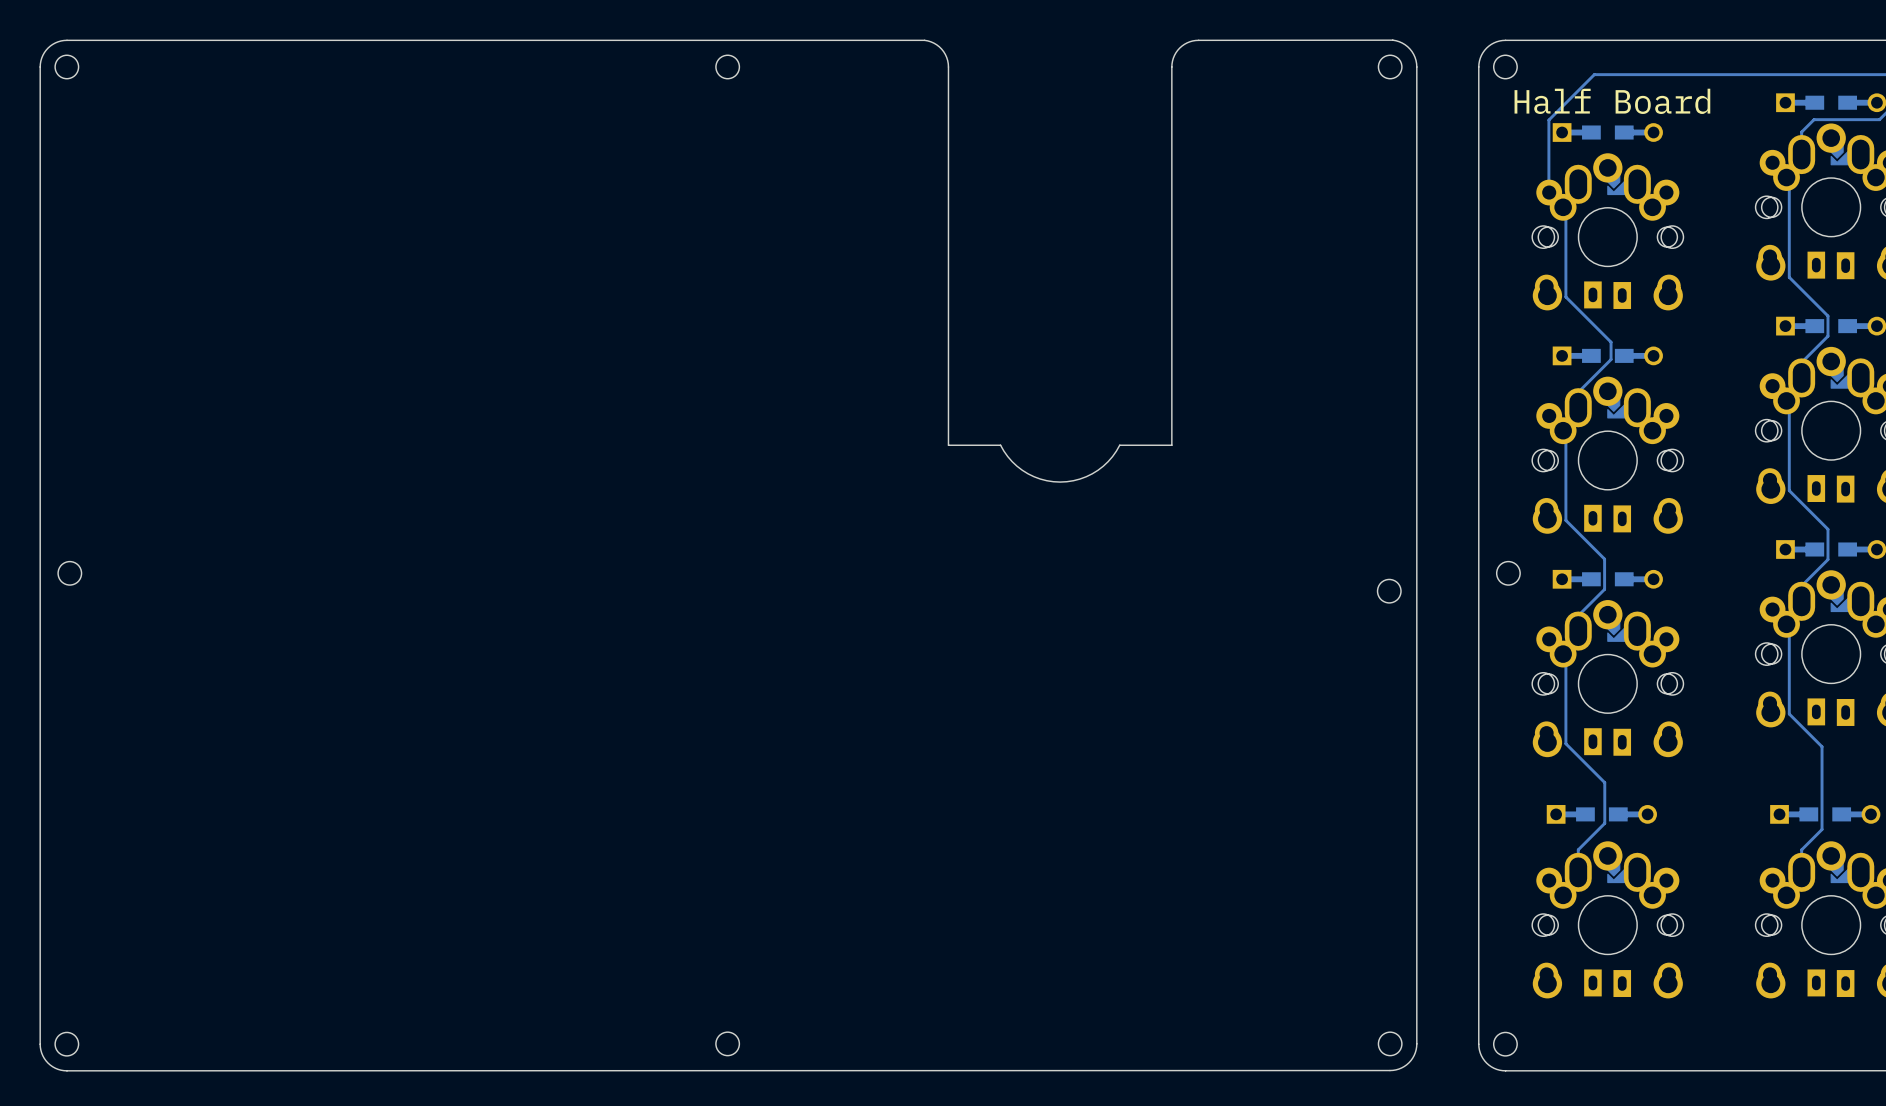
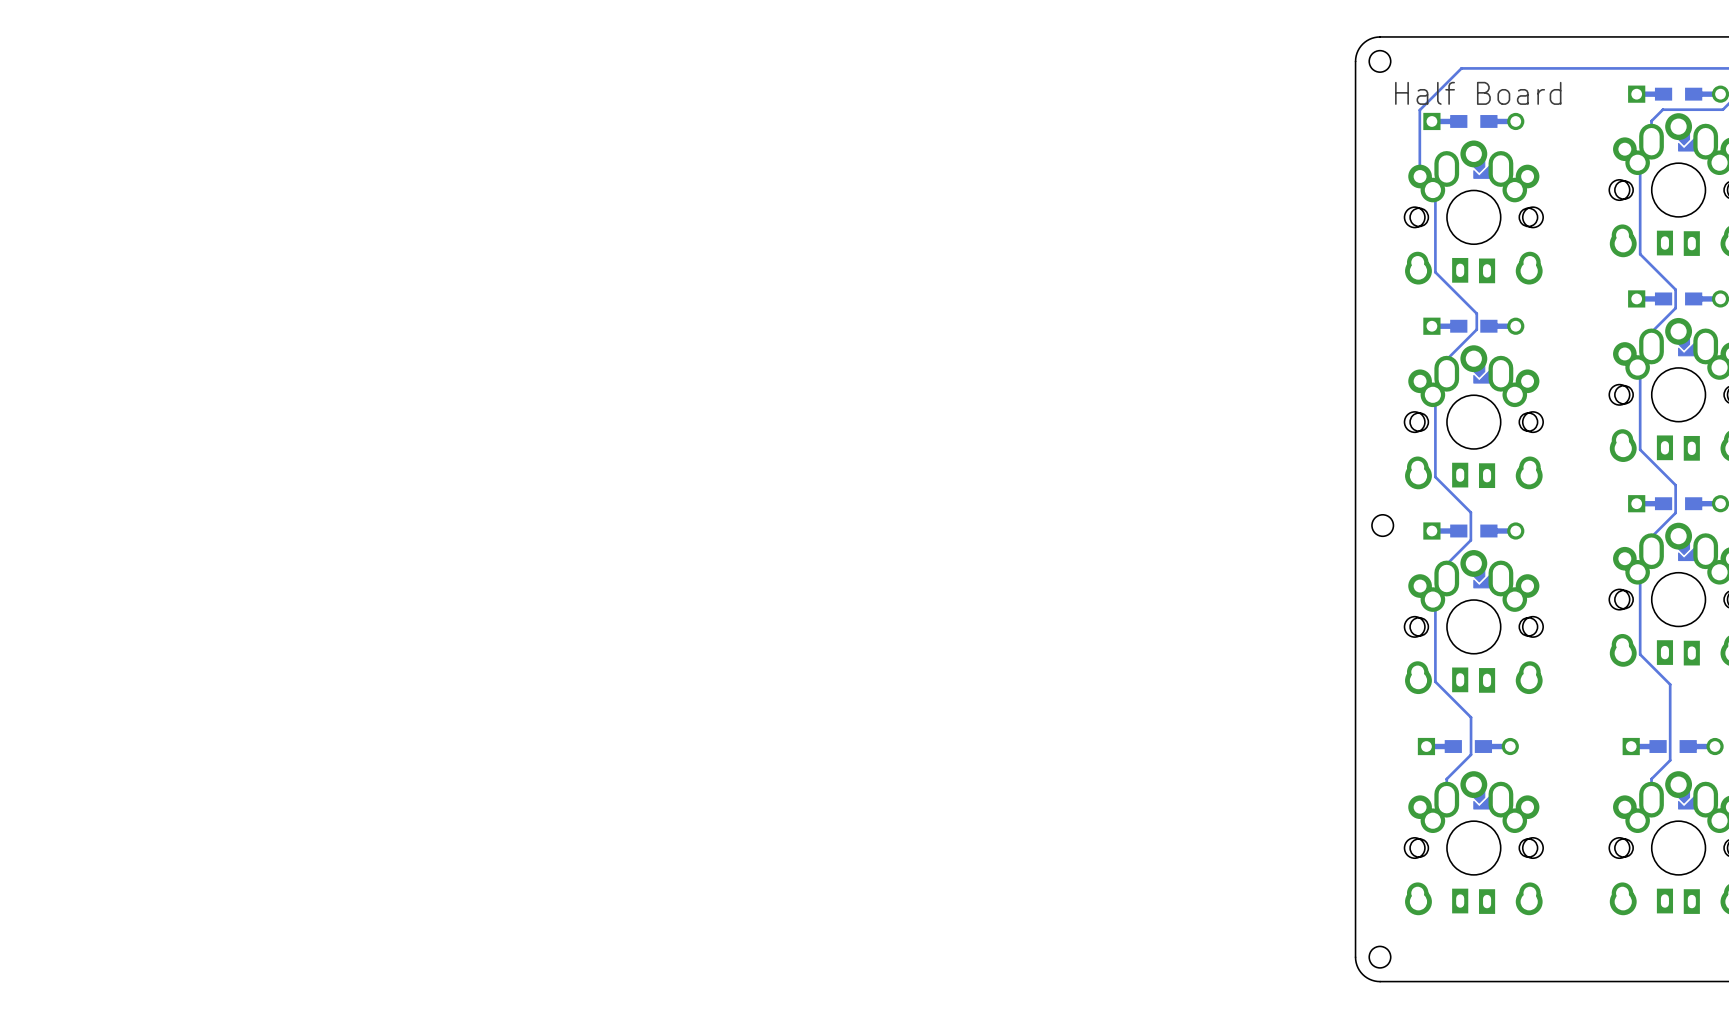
round board edge: [54, 54, 79, 80] -> none
round board edge: [715, 54, 740, 80] -> none
round board edge: [1378, 54, 1403, 80] -> none
board edge: (1000, 445) (1012, 461) (1028, 473) (1040, 479) (1060, 482) (1079, 479) (1097, 470) (1108, 461) (1119, 445) (1171, 445) (1171, 66) (1174, 55) (1179, 48) (1187, 42) (1198, 40) (1392, 40) (1402, 43) (1409, 48) (1415, 57) (1416, 66) (1416, 1043) (1414, 1055) (1404, 1066) (1389, 1070) (66, 1070) (52, 1066) (44, 1058) (40, 1044) (40, 66) (44, 52) (52, 44) (67, 40) (930, 41) (943, 51) (948, 67) (948, 445) (1000, 445) -> none
round board edge: [57, 561, 82, 586] -> none
round board edge: [1377, 579, 1402, 604] -> none
round board edge: [715, 1031, 740, 1056] -> none
round board edge: [1378, 1031, 1403, 1056] -> none
round board edge: [54, 1032, 79, 1057] -> none

